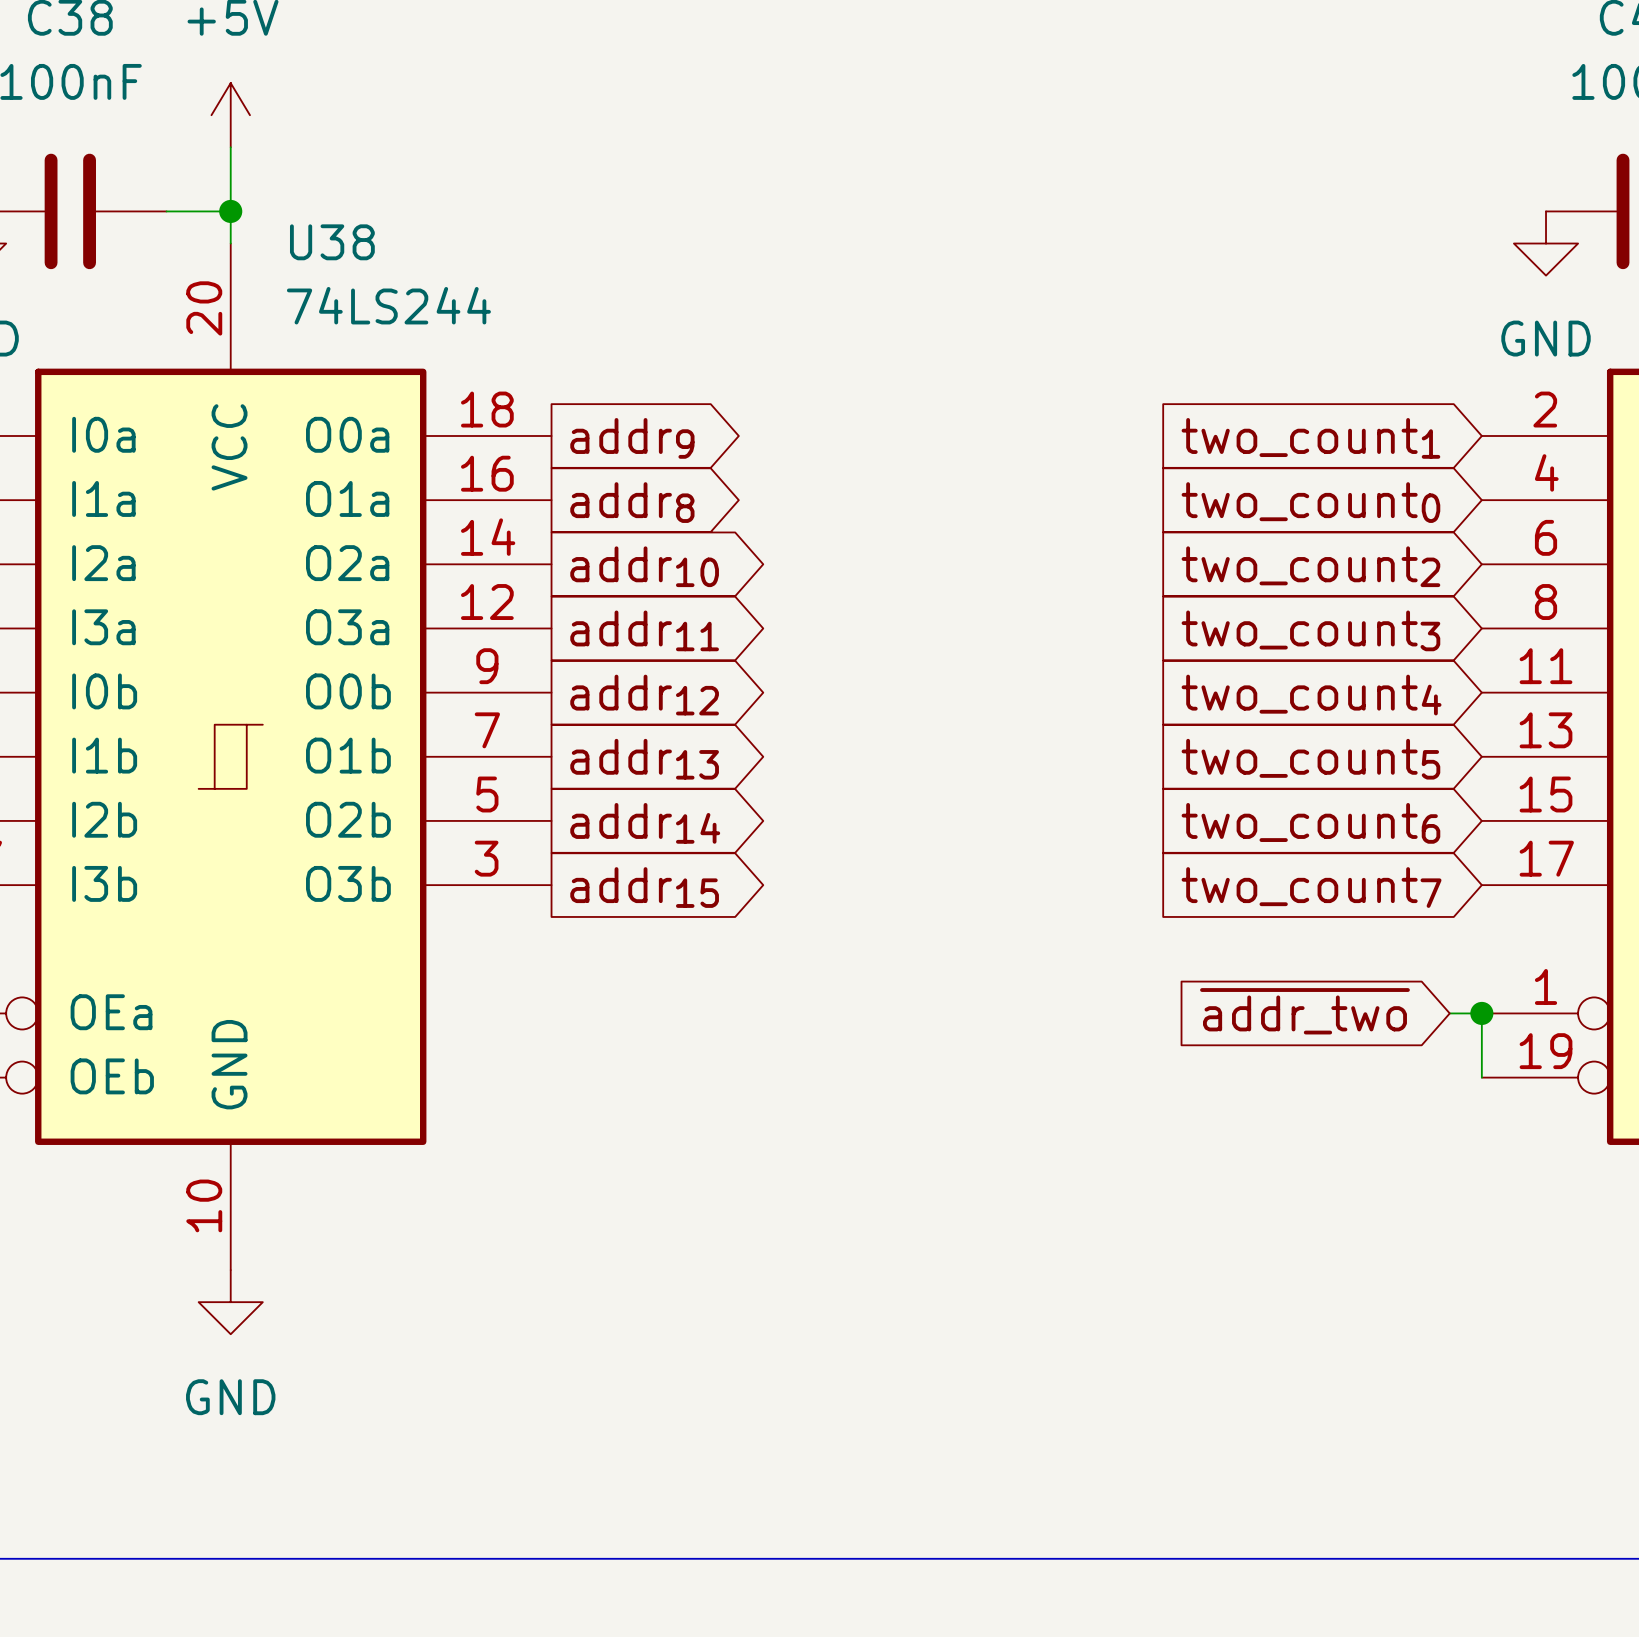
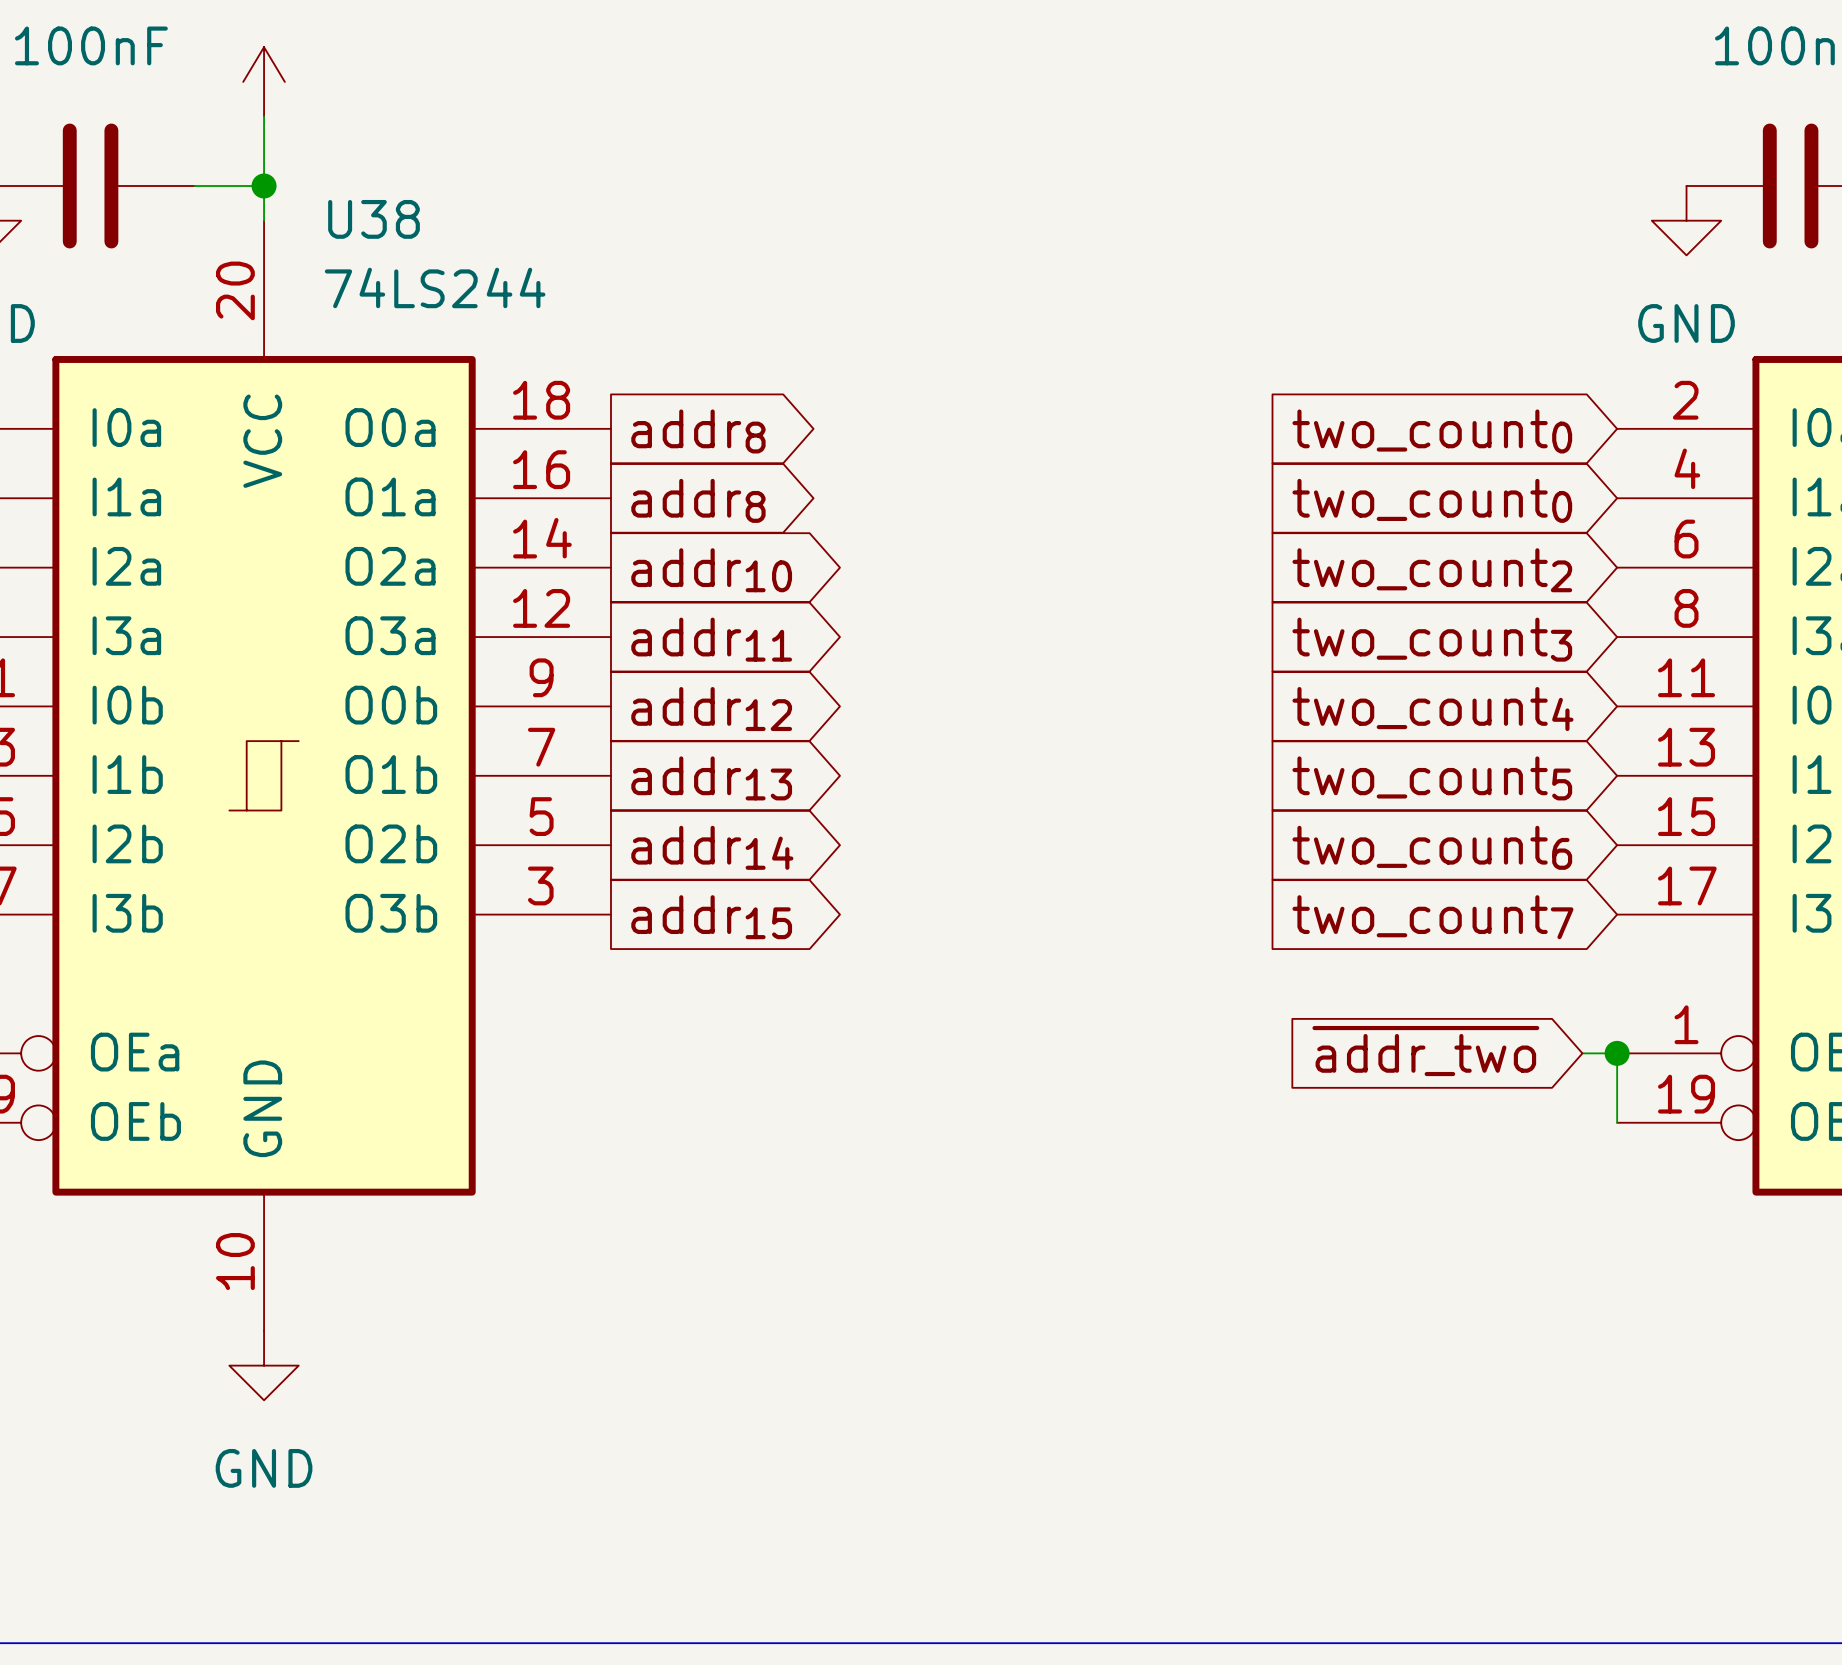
global label: addr9 (632, 438) -> addr8 (698, 431)
global label: two_count1 (1310, 438) -> two_count0 (1432, 431)

